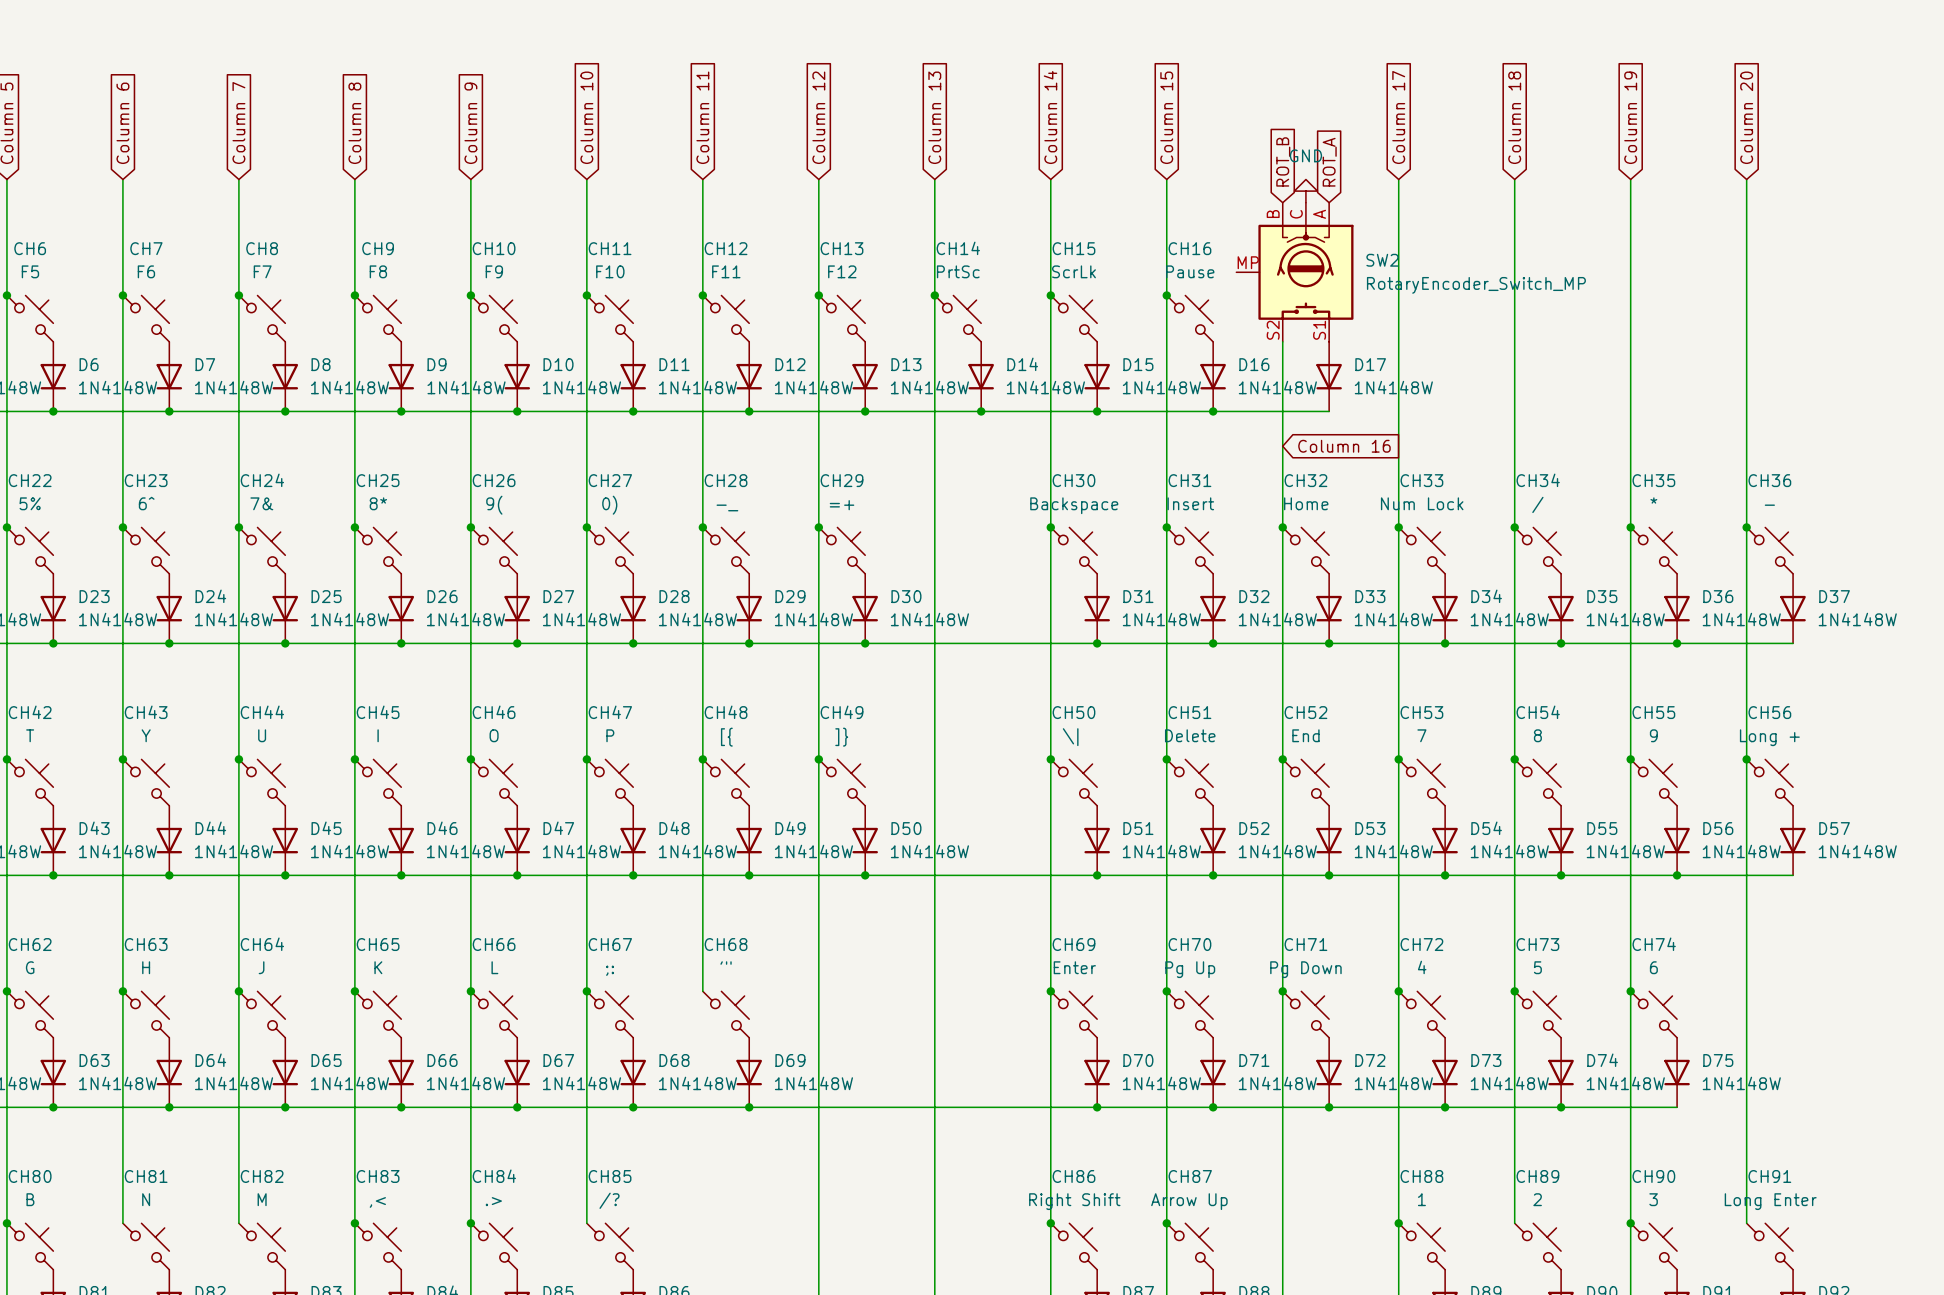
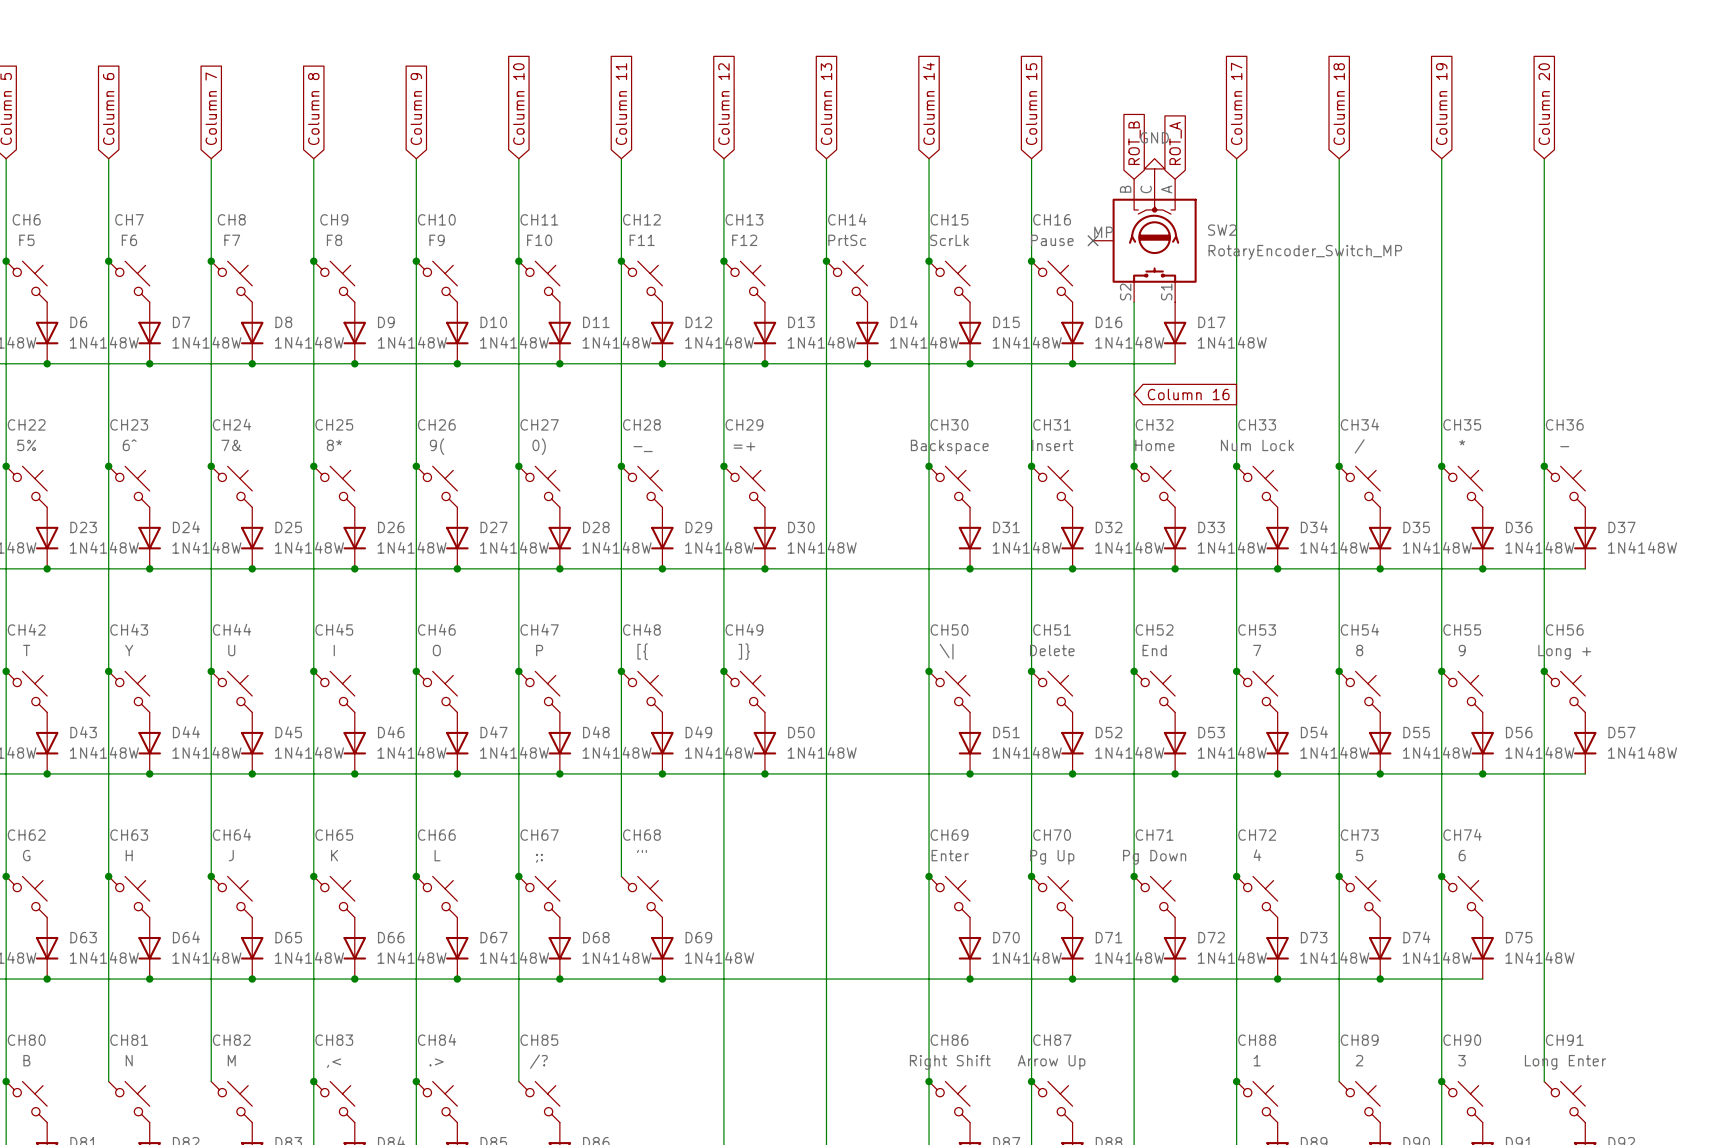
no-connect mark: none -> (1093, 240)

